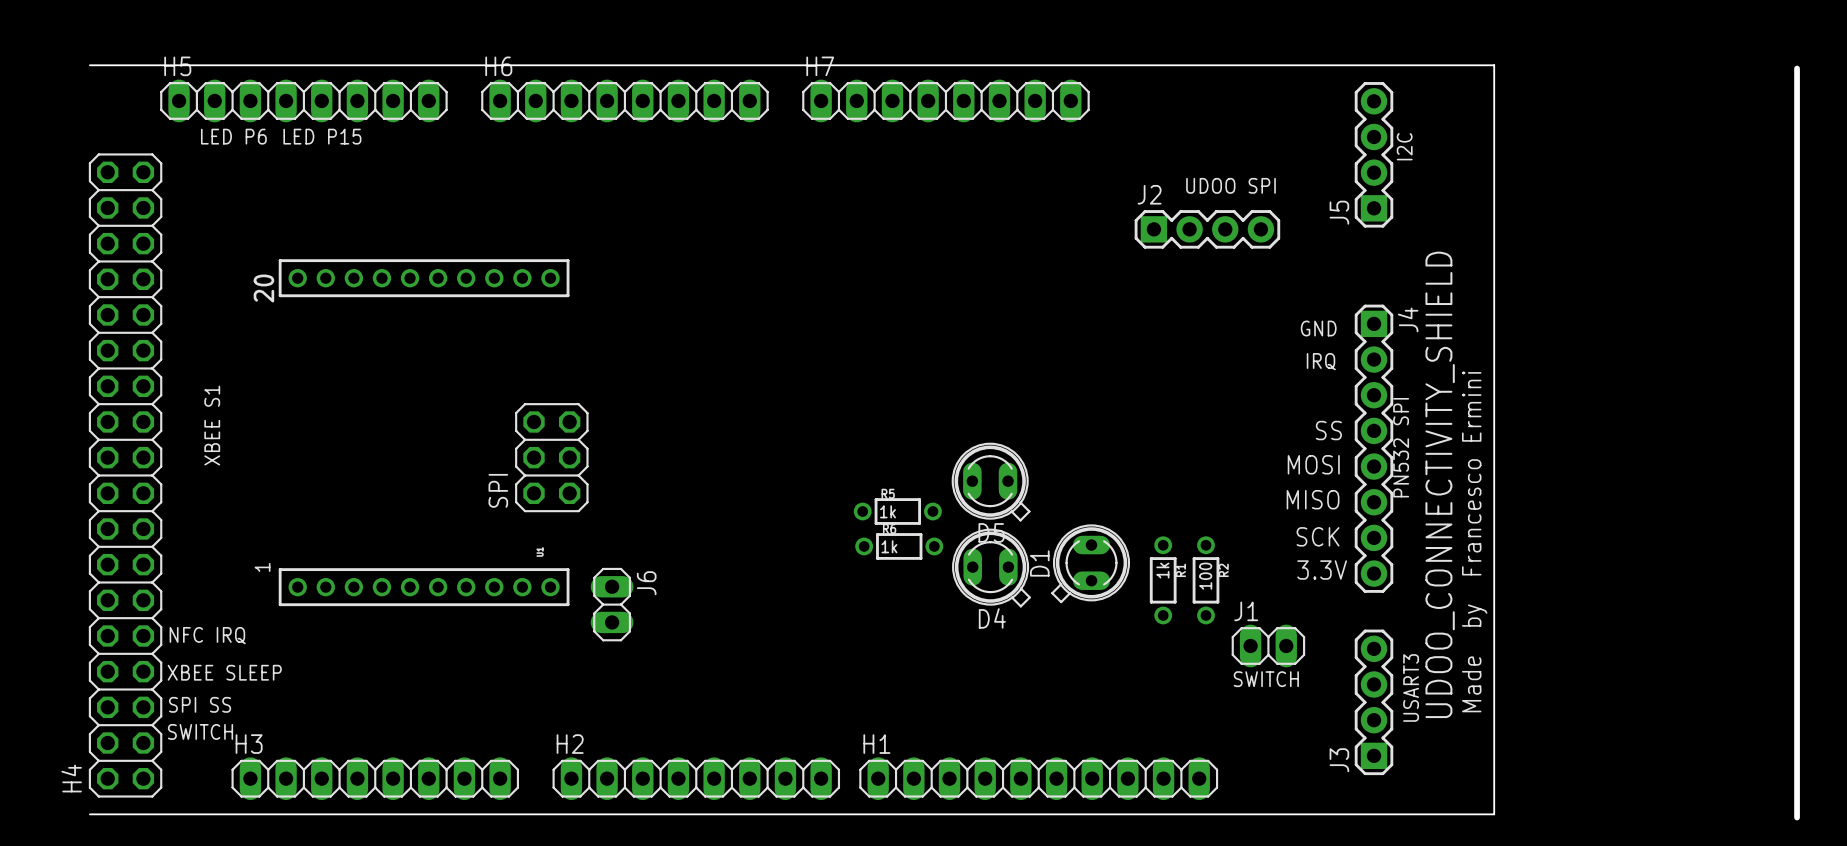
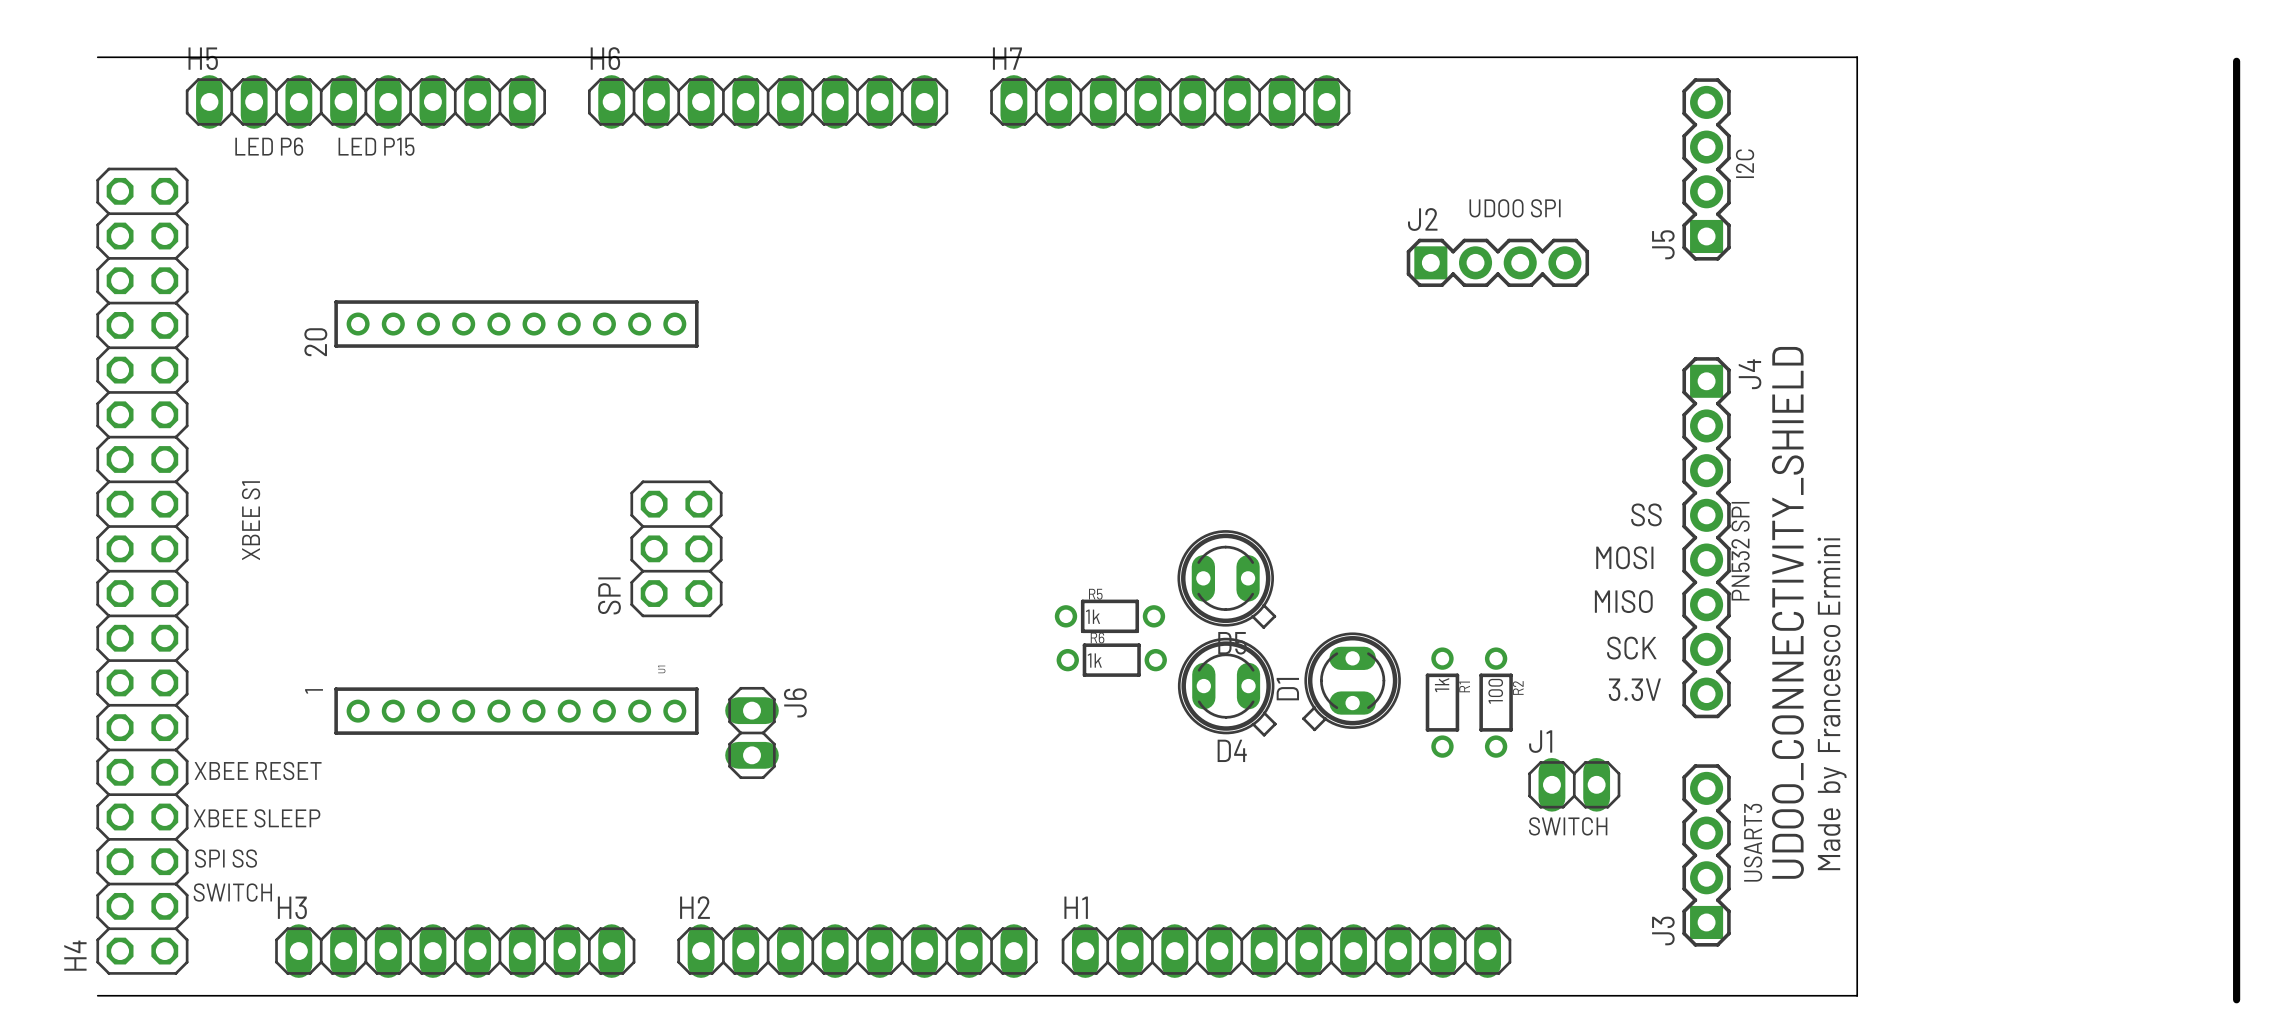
text: GND (1318, 328) -> none
text: IRQ (1321, 361) -> none
text: NFC IRQ (207, 635) -> XBEE RESET (258, 770)

